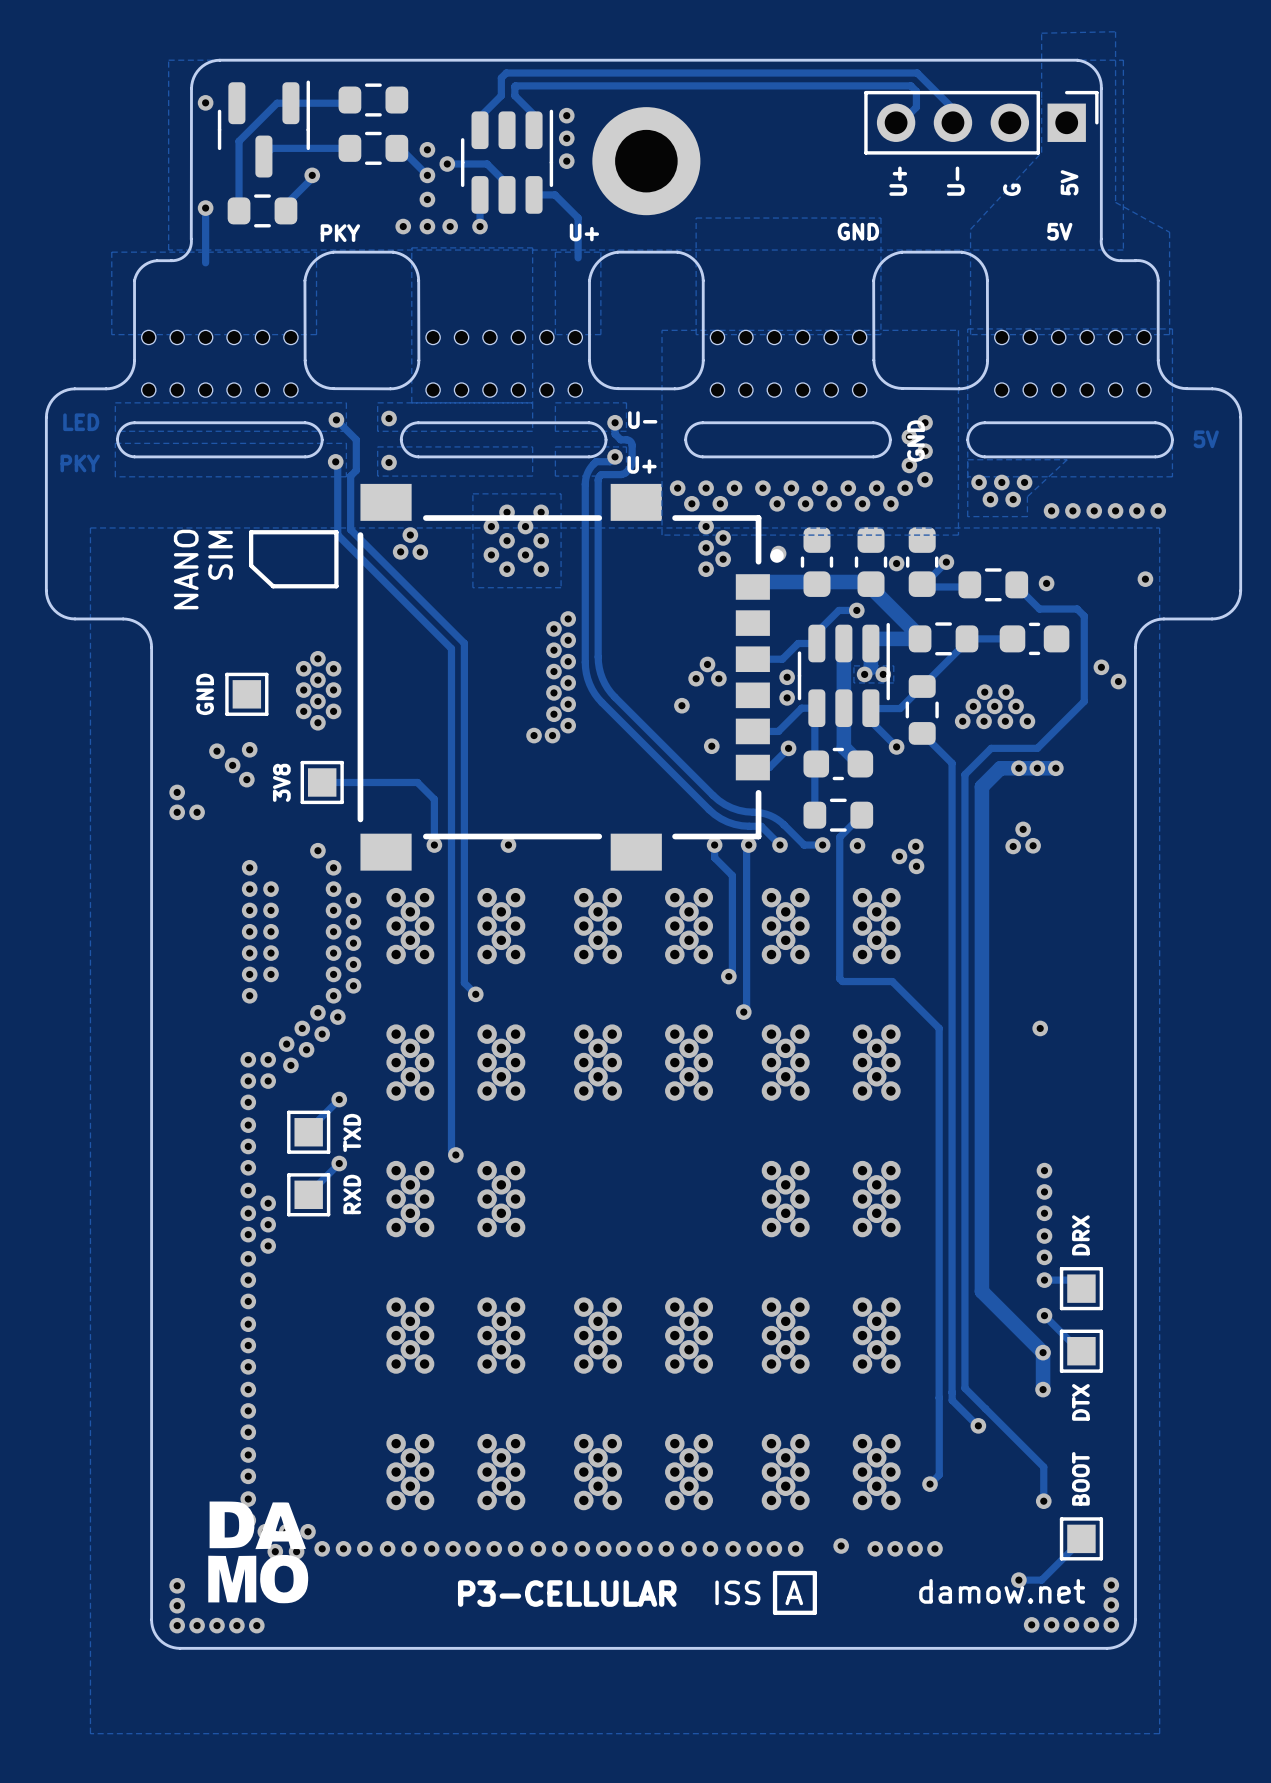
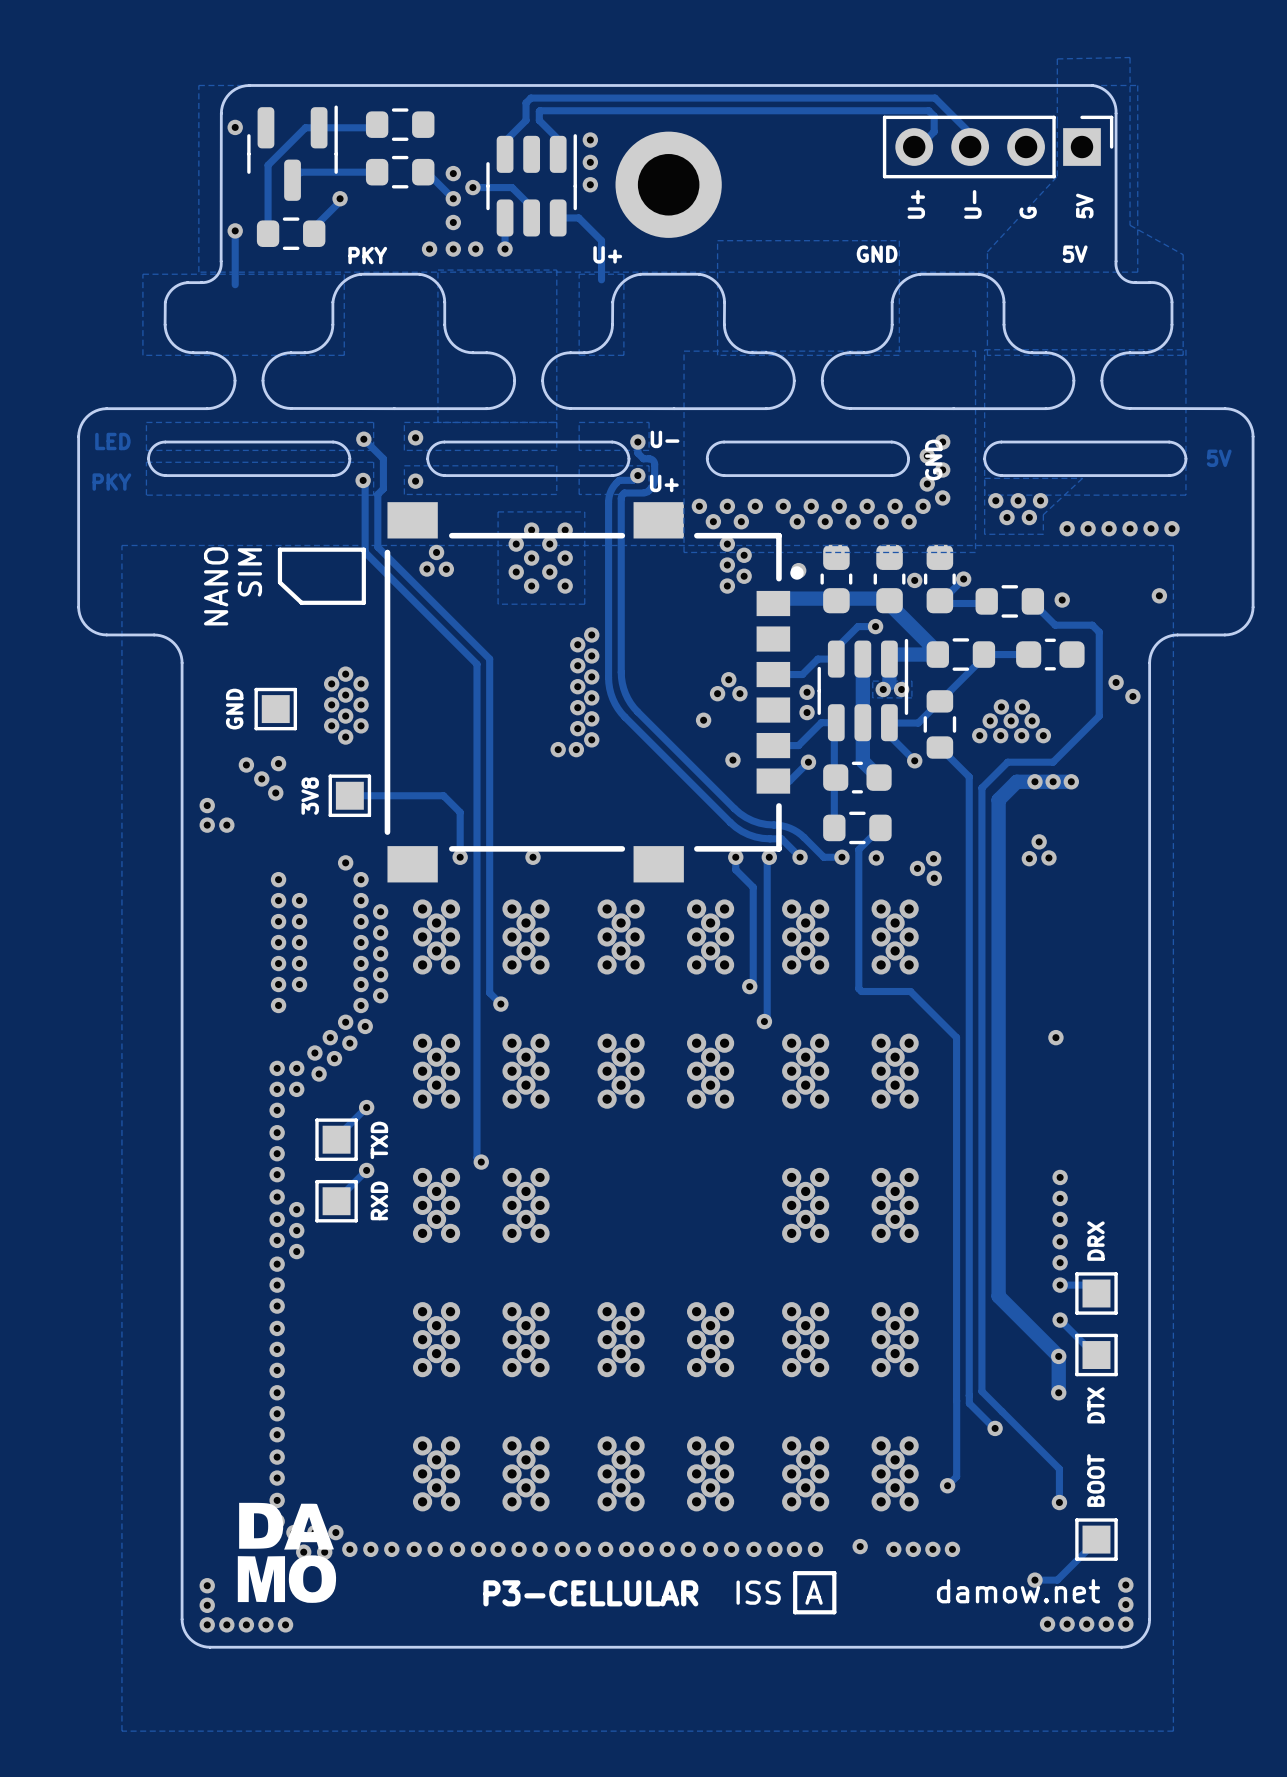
board edge: (134, 280) (133, 366) (130, 375) (123, 382) (115, 387) (106, 388) -> (165, 302) (165, 328) (170, 341) (186, 351) (213, 353) (224, 358) (233, 371) (234, 386) (226, 400) (213, 407) (137, 408)
board edge: (304, 280) (305, 360) (311, 377) (319, 384) (330, 388) (390, 388) (399, 387) (408, 382) (414, 375) (418, 366) (418, 280) -> (332, 302) (332, 328) (324, 344) (311, 351) (281, 354) (271, 360) (265, 368) (263, 377) (264, 387) (268, 397) (277, 404) (291, 408) (486, 408) (498, 405) (508, 398) (513, 389) (514, 377) (511, 368) (506, 360) (495, 354) (465, 351) (453, 344) (445, 328) (444, 302)
board edge: (589, 280) (589, 360) (595, 377) (603, 384) (614, 388) (674, 388) (684, 387) (692, 382) (698, 375) (702, 366) (703, 280) -> (612, 302) (612, 328) (604, 344) (591, 351) (561, 354) (553, 358) (545, 368) (542, 377) (543, 387) (548, 397) (556, 404) (570, 408) (766, 408) (778, 405) (786, 400) (792, 389) (794, 377) (791, 368) (783, 358) (775, 354) (745, 351) (732, 344) (724, 328) (724, 302)
board edge: (873, 280) (873, 360) (879, 377) (888, 384) (898, 388) (959, 388) (968, 387) (976, 382) (983, 375) (986, 366) (987, 280) -> (892, 302) (891, 328) (883, 344) (871, 351) (840, 354) (830, 360) (825, 368) (822, 377) (823, 387) (828, 397) (836, 404) (850, 408) (1045, 408) (1058, 405) (1067, 398) (1072, 389) (1073, 377) (1071, 368) (1063, 358) (1055, 354) (1024, 351) (1012, 344) (1004, 328) (1004, 302)
board edge: (1158, 303) (1158, 360) (1162, 374) (1169, 382) (1179, 387) (1212, 388) -> (1171, 324) (1168, 338) (1157, 349) (1147, 352) (1123, 353) (1110, 360) (1104, 368) (1102, 377) (1105, 394) (1116, 404) (1126, 408) (1225, 408)
part: (148, 337) -> none
part: (177, 337) -> none
part: (205, 337) -> none
part: (234, 337) -> none
part: (262, 337) -> none
part: (290, 337) -> none
part: (433, 337) -> none
part: (461, 337) -> none
part: (489, 337) -> none
part: (518, 337) -> none
part: (546, 337) -> none
part: (575, 337) -> none
part: (717, 337) -> none
part: (745, 337) -> none
part: (774, 337) -> none
part: (802, 337) -> none
part: (831, 337) -> none
part: (859, 337) -> none
part: (1001, 337) -> none
part: (1030, 337) -> none
part: (1058, 337) -> none
part: (1087, 337) -> none
part: (1115, 337) -> none
part: (1144, 337) -> none
part: (148, 390) -> none
part: (177, 390) -> none
part: (205, 390) -> none
part: (234, 390) -> none
part: (262, 390) -> none
part: (290, 390) -> none
part: (433, 390) -> none
part: (461, 390) -> none
part: (489, 390) -> none
part: (518, 390) -> none
part: (546, 390) -> none
part: (575, 390) -> none
part: (717, 390) -> none
part: (745, 390) -> none
part: (774, 390) -> none
part: (802, 390) -> none
part: (831, 390) -> none
part: (859, 390) -> none
part: (1001, 390) -> none
part: (1030, 390) -> none
part: (1058, 390) -> none
part: (1087, 390) -> none
part: (1115, 390) -> none
part: (1144, 390) -> none

